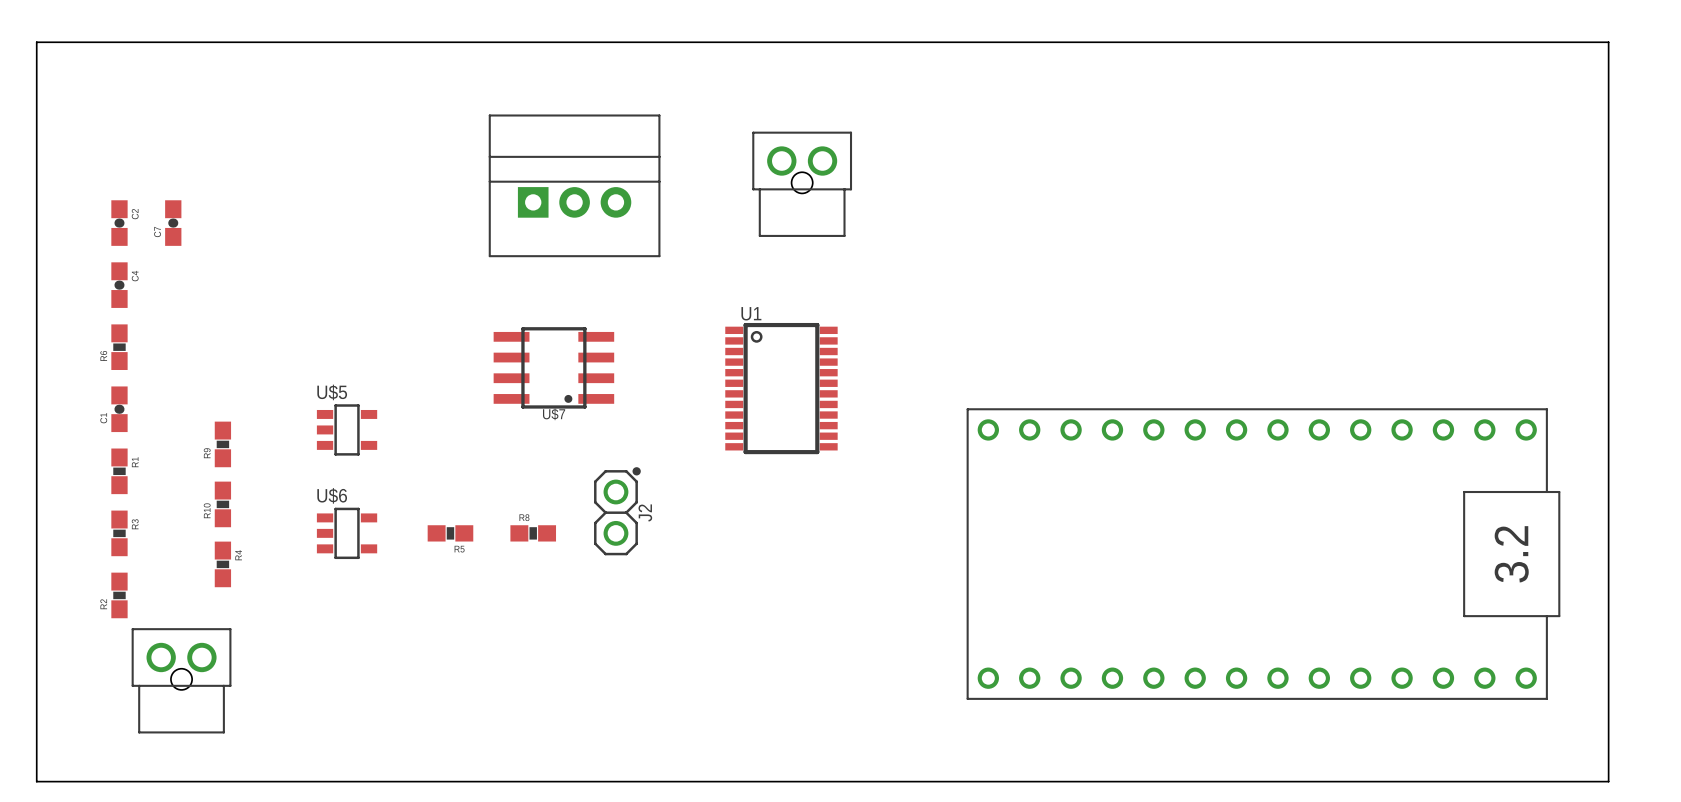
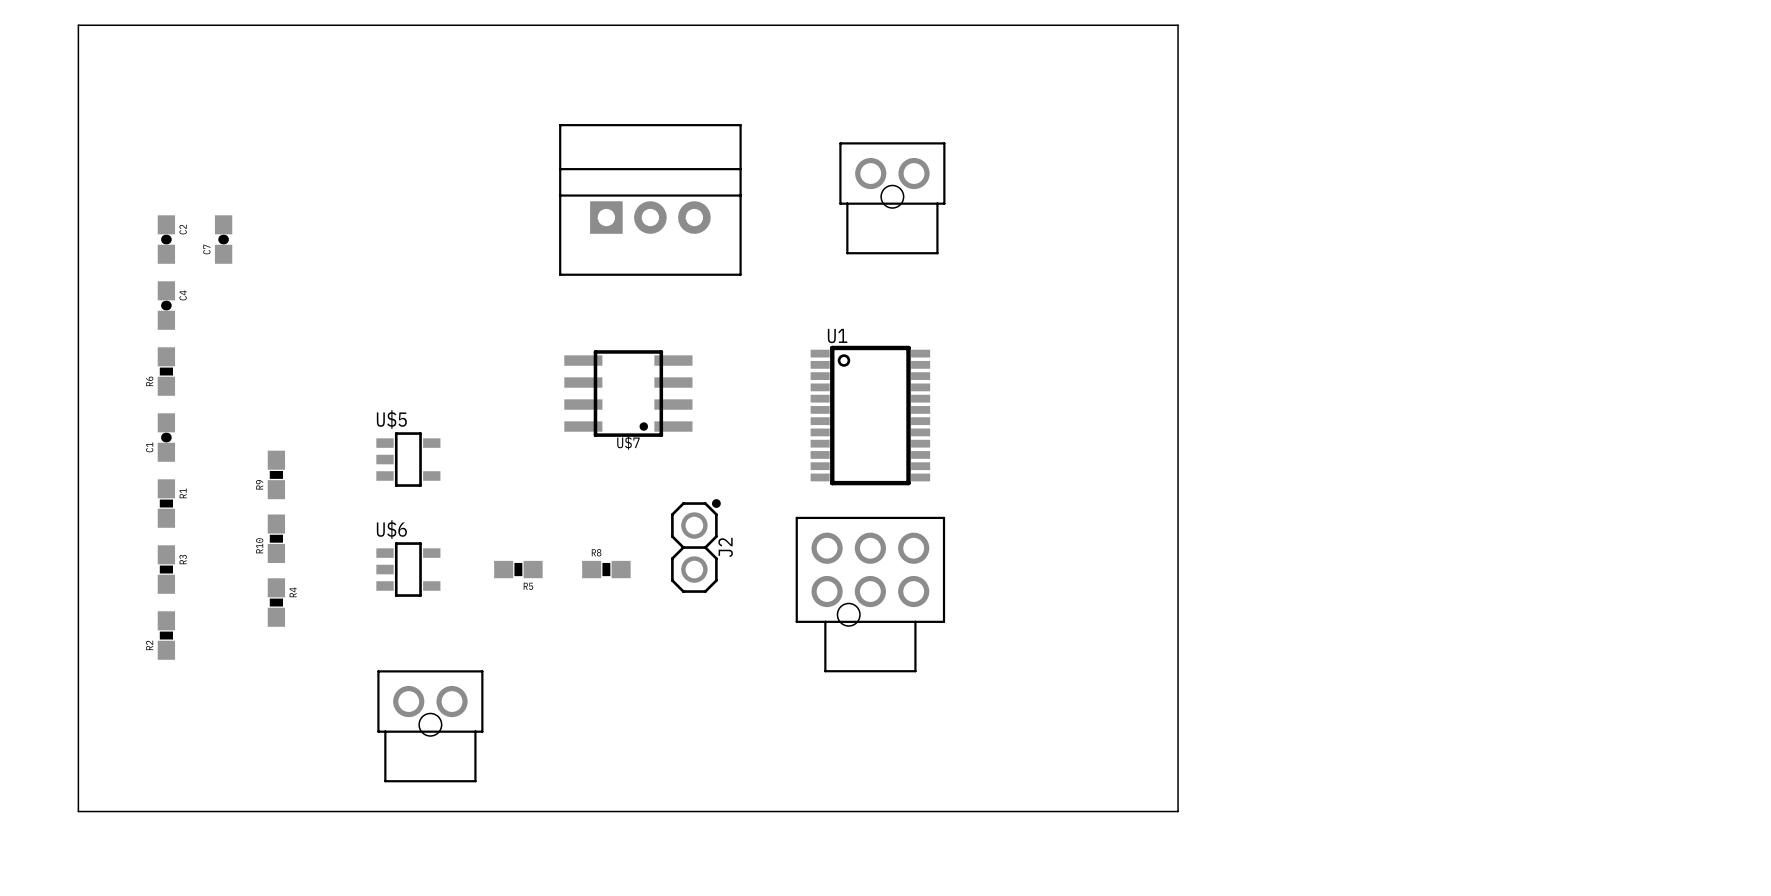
board edge: (36, 42) (1608, 42) (1608, 781) (36, 781) (36, 760) -> (78, 47) (78, 25) (1178, 25) (1178, 811) (78, 811)
part: (1263, 554) -> none
part: none -> (870, 594)
part position: (181, 680) -> (430, 726)

